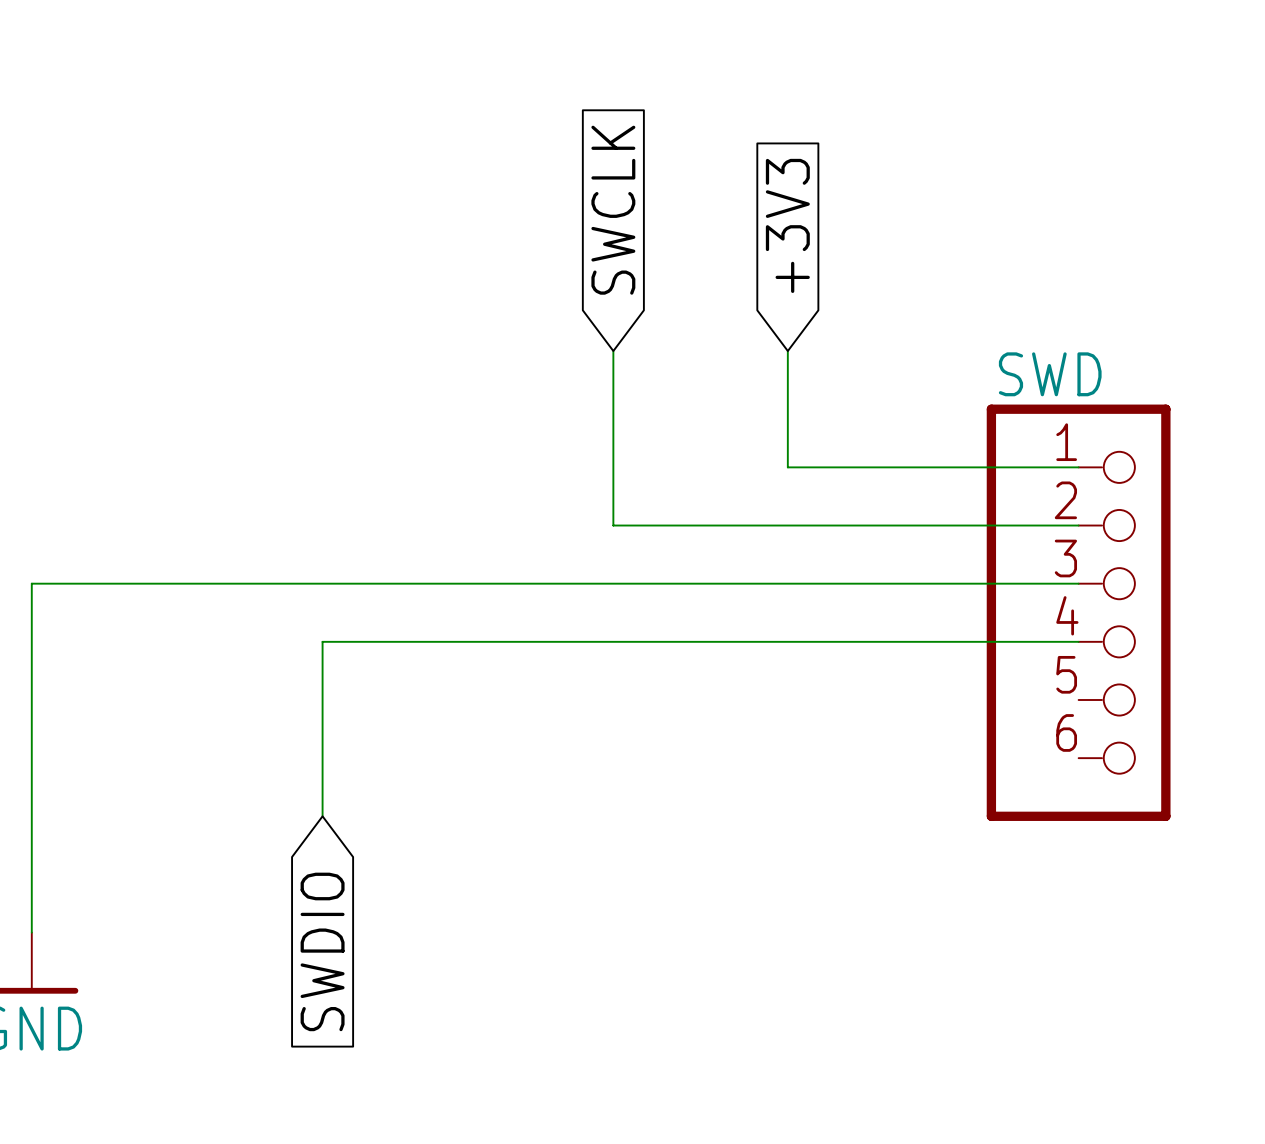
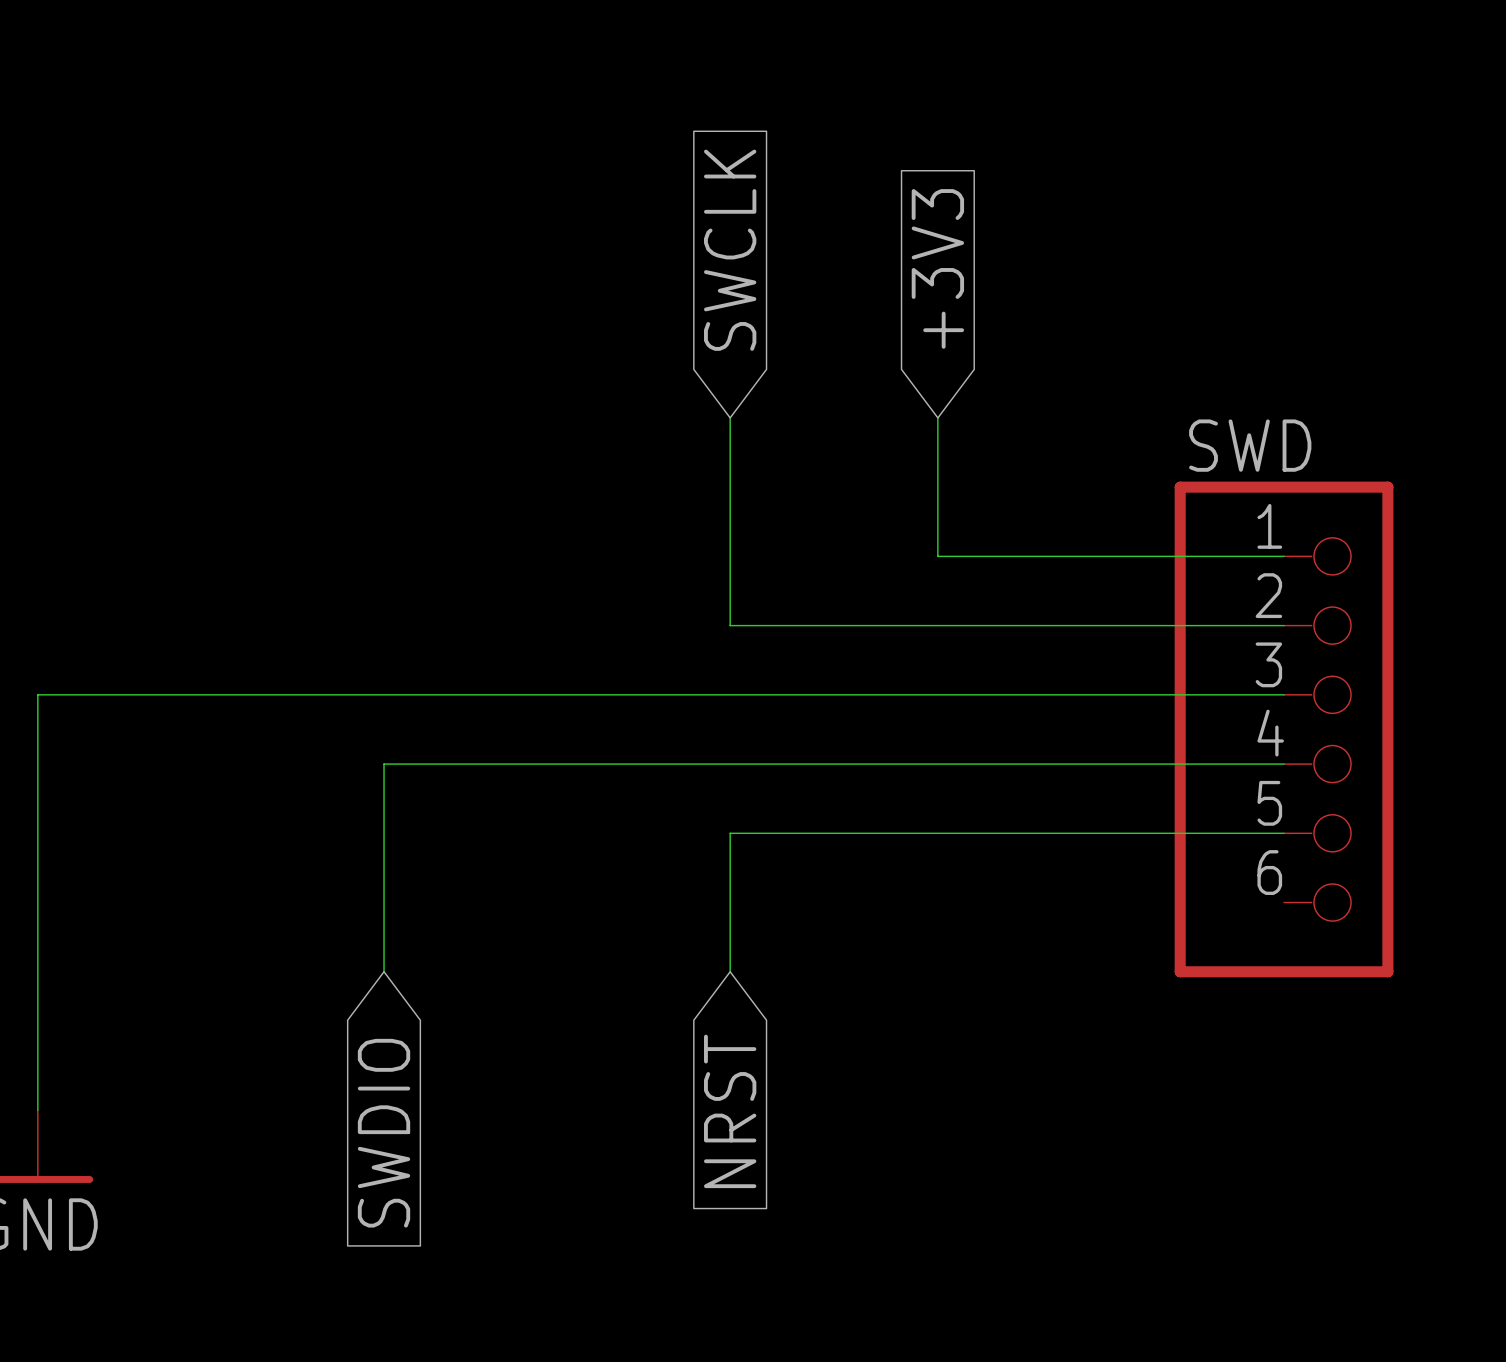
wire: none -> (1284, 833) (730, 833) (730, 971)
global label: none -> NRST (730, 1111)

